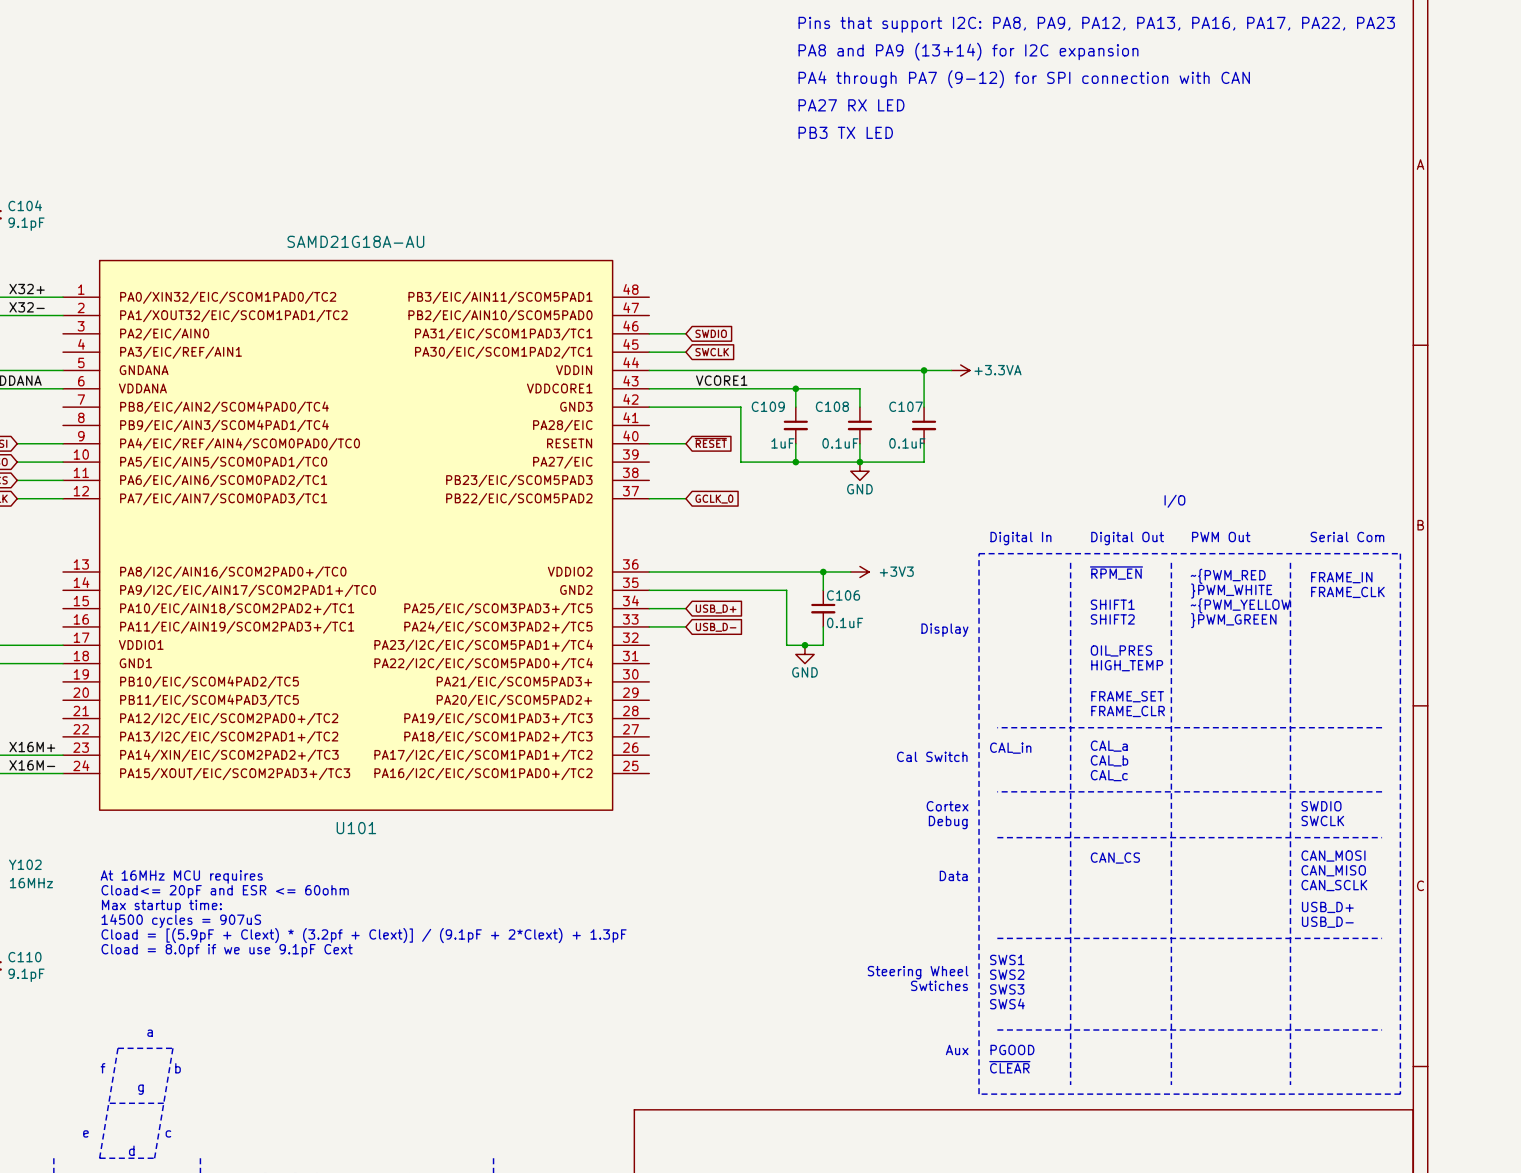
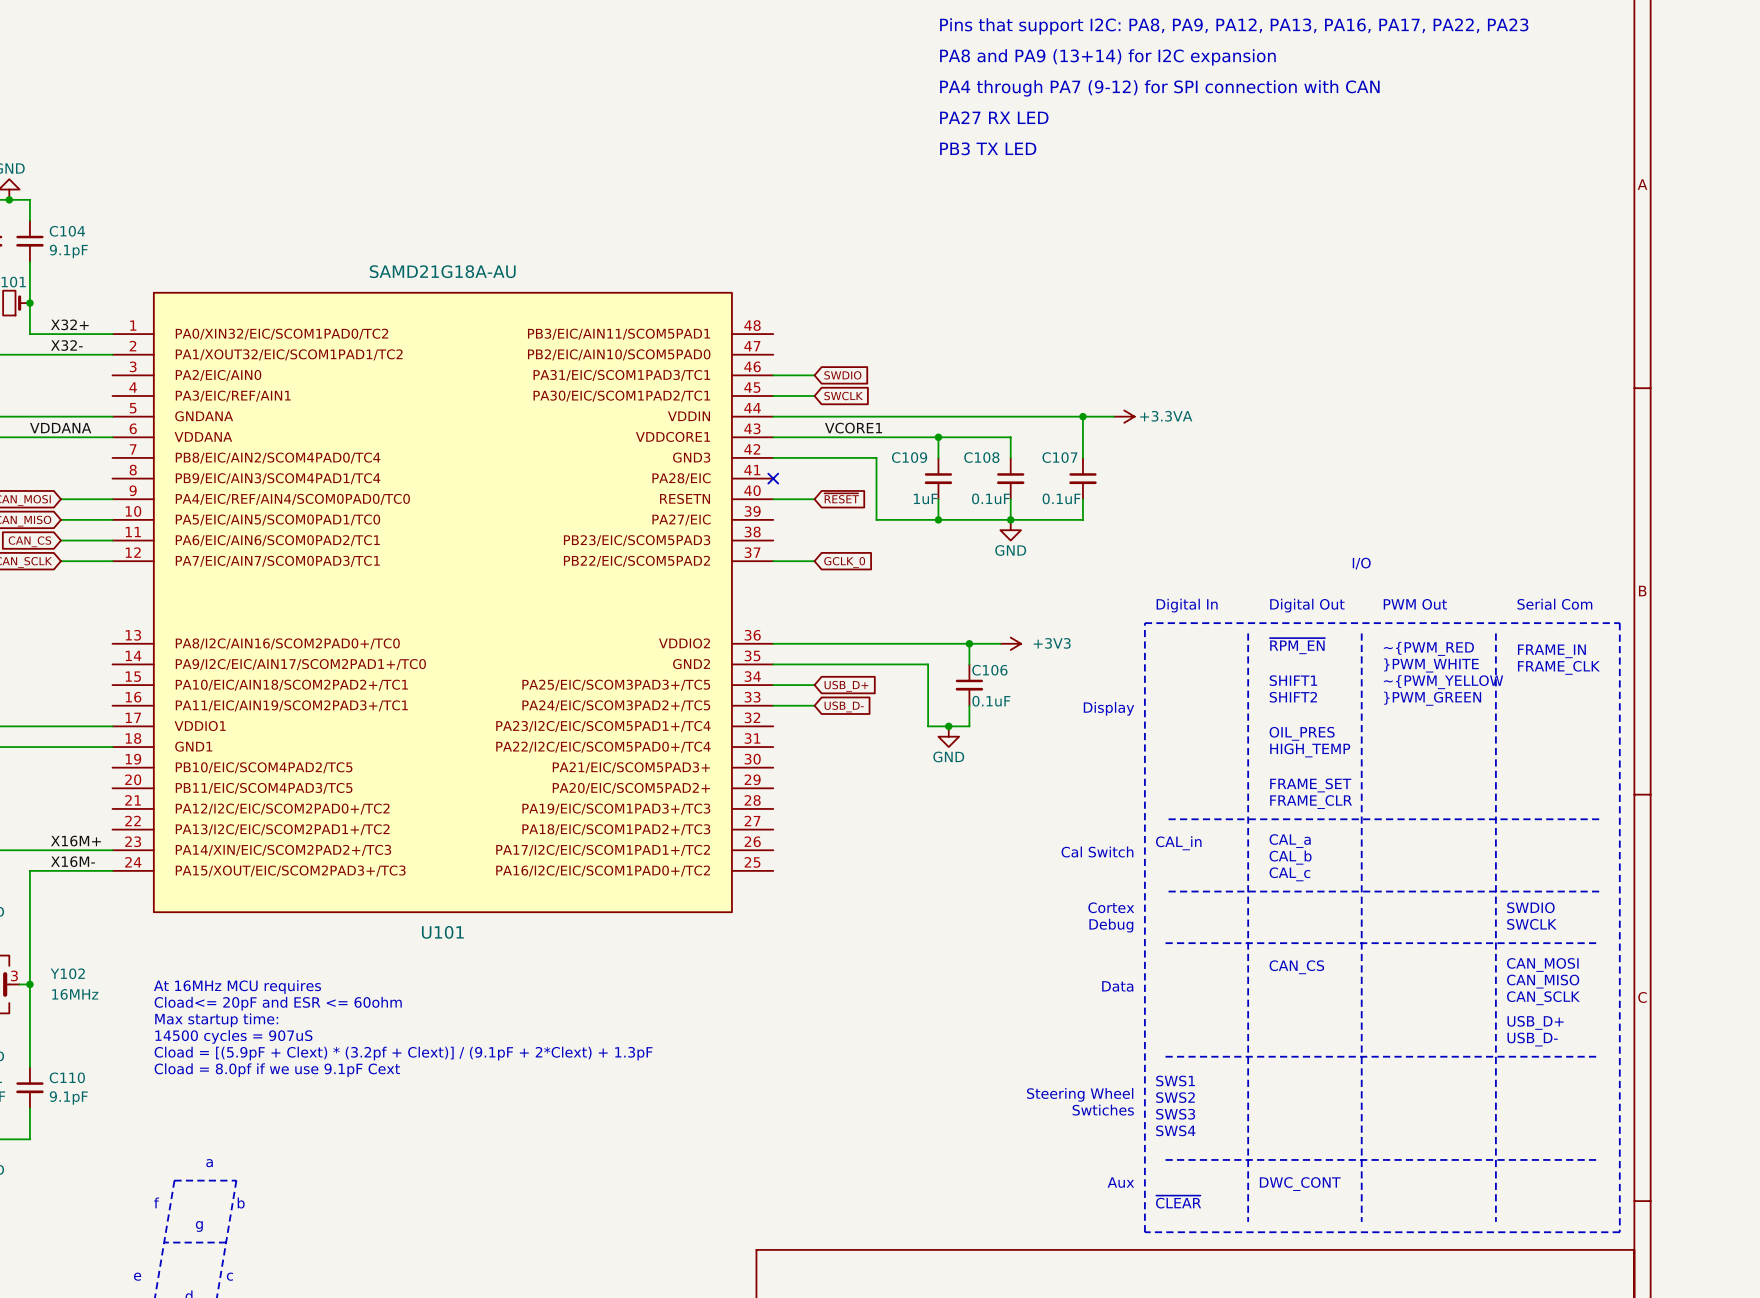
no-connect mark: none -> (773, 478)
text: PGOOD (1012, 1049) -> none
text: none -> DWC_CONT (1300, 1184)

